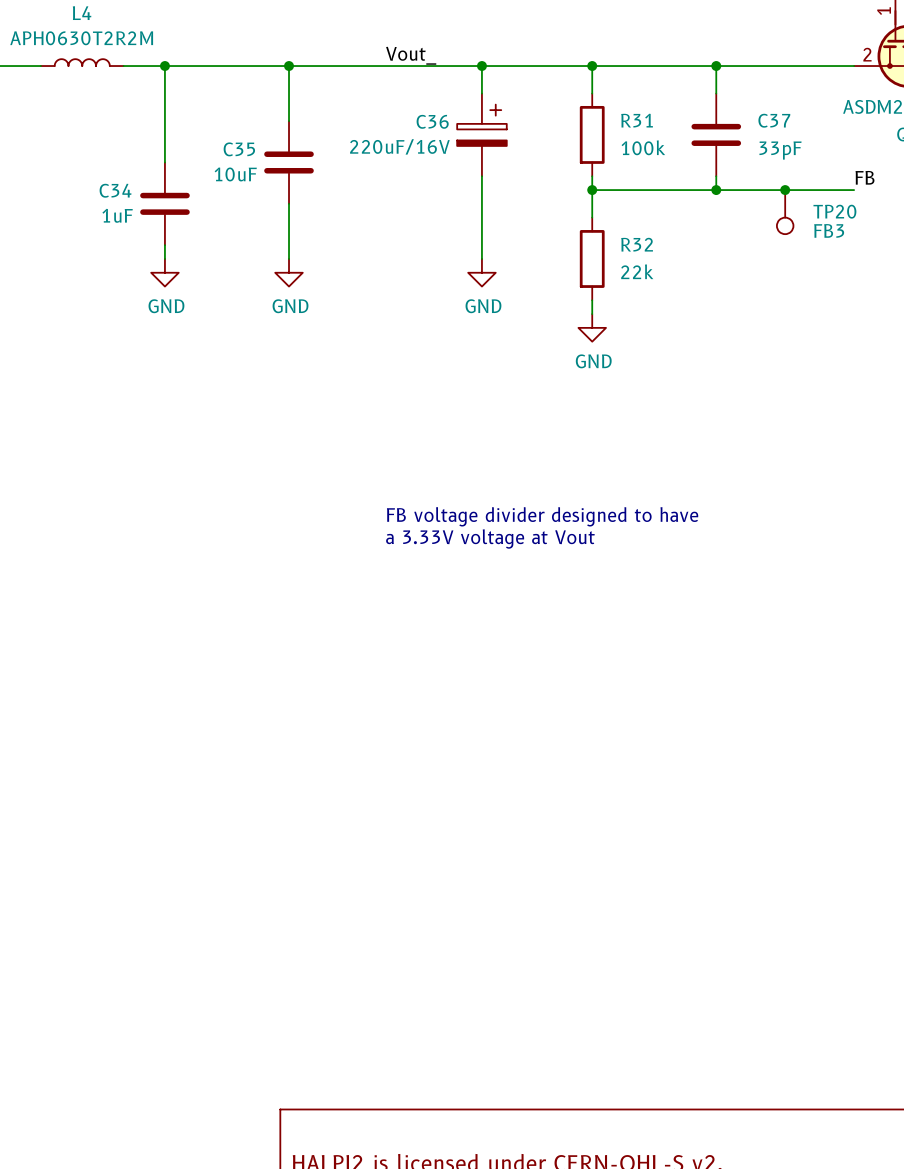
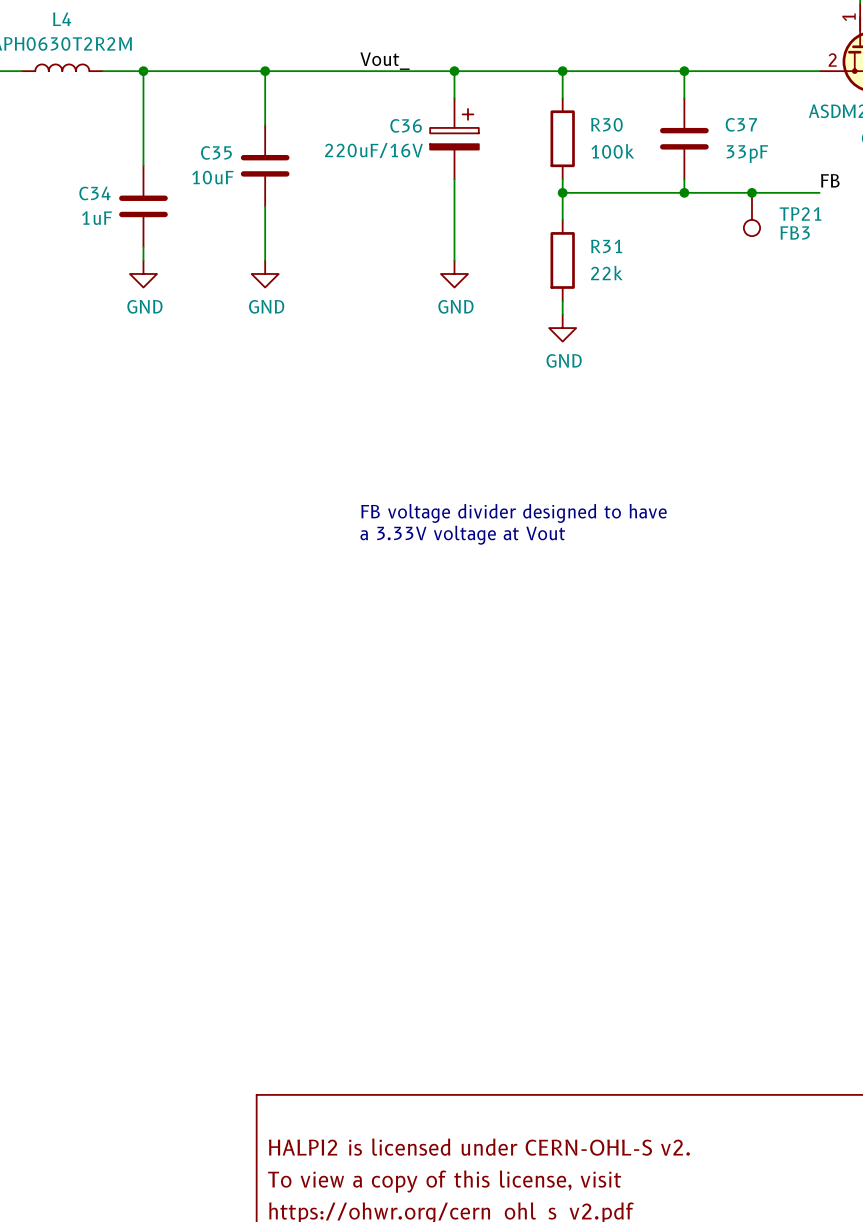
R31 name: R31 (637, 120) -> R30 (606, 124)
TP20 name: TP20 (834, 211) -> TP21 (800, 213)
R32 name: R32 (637, 244) -> R31 (606, 246)

